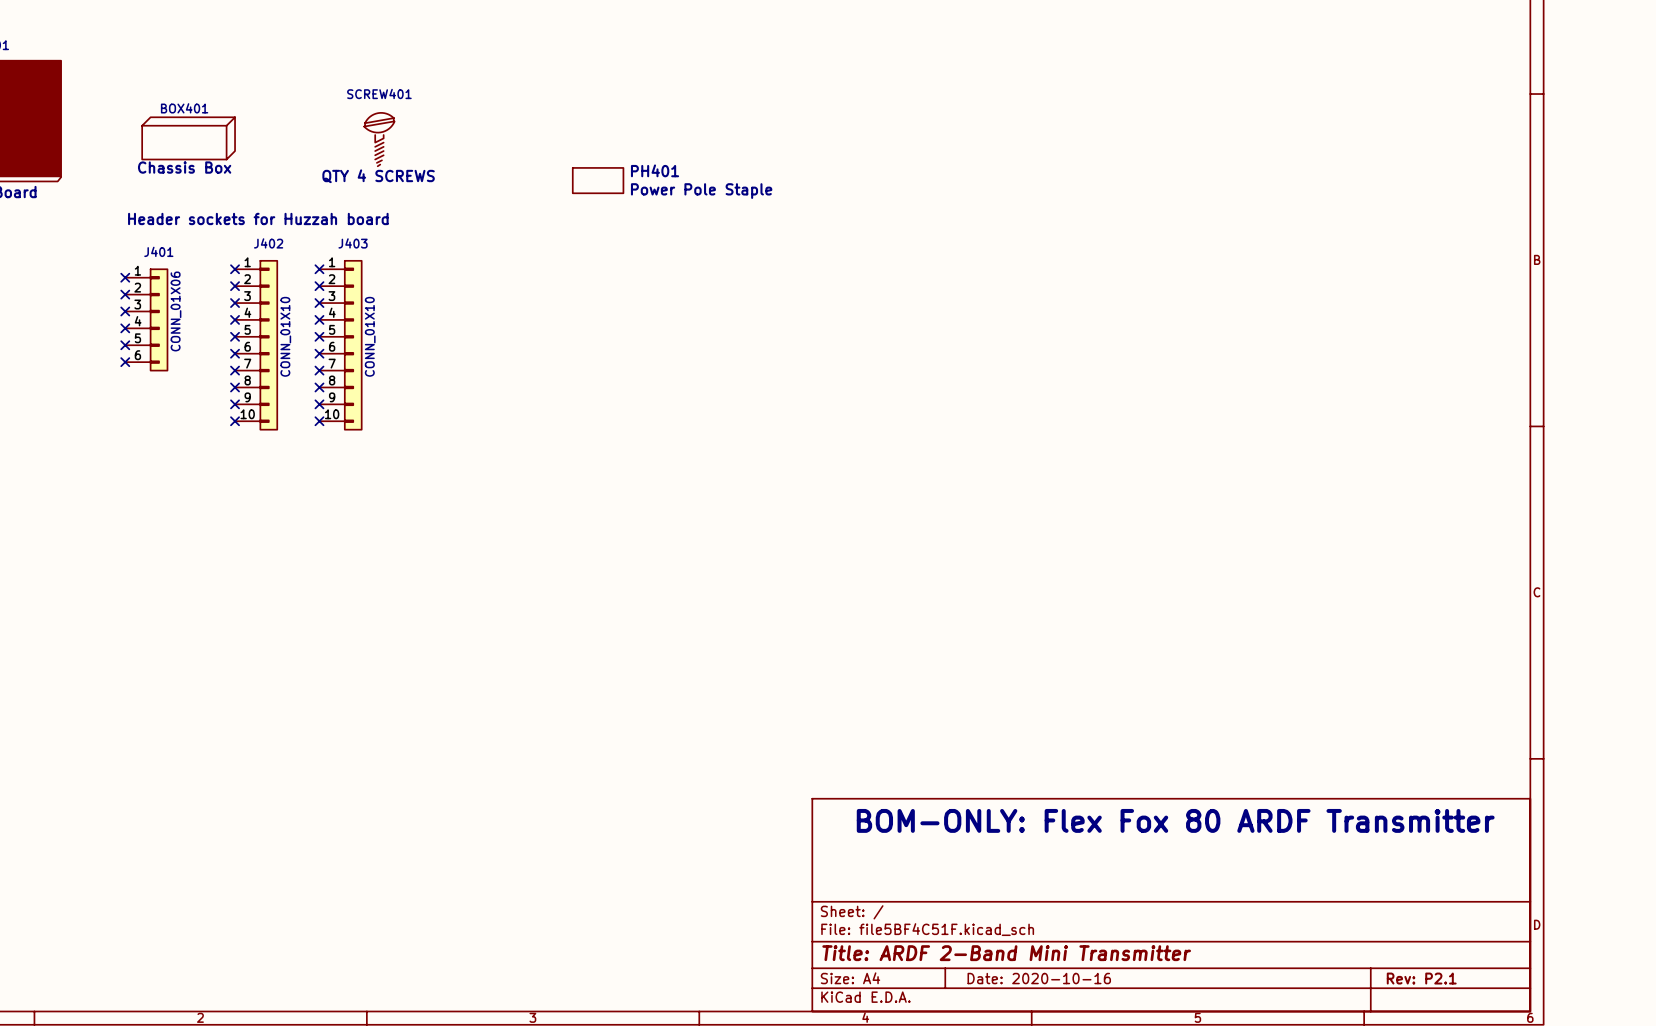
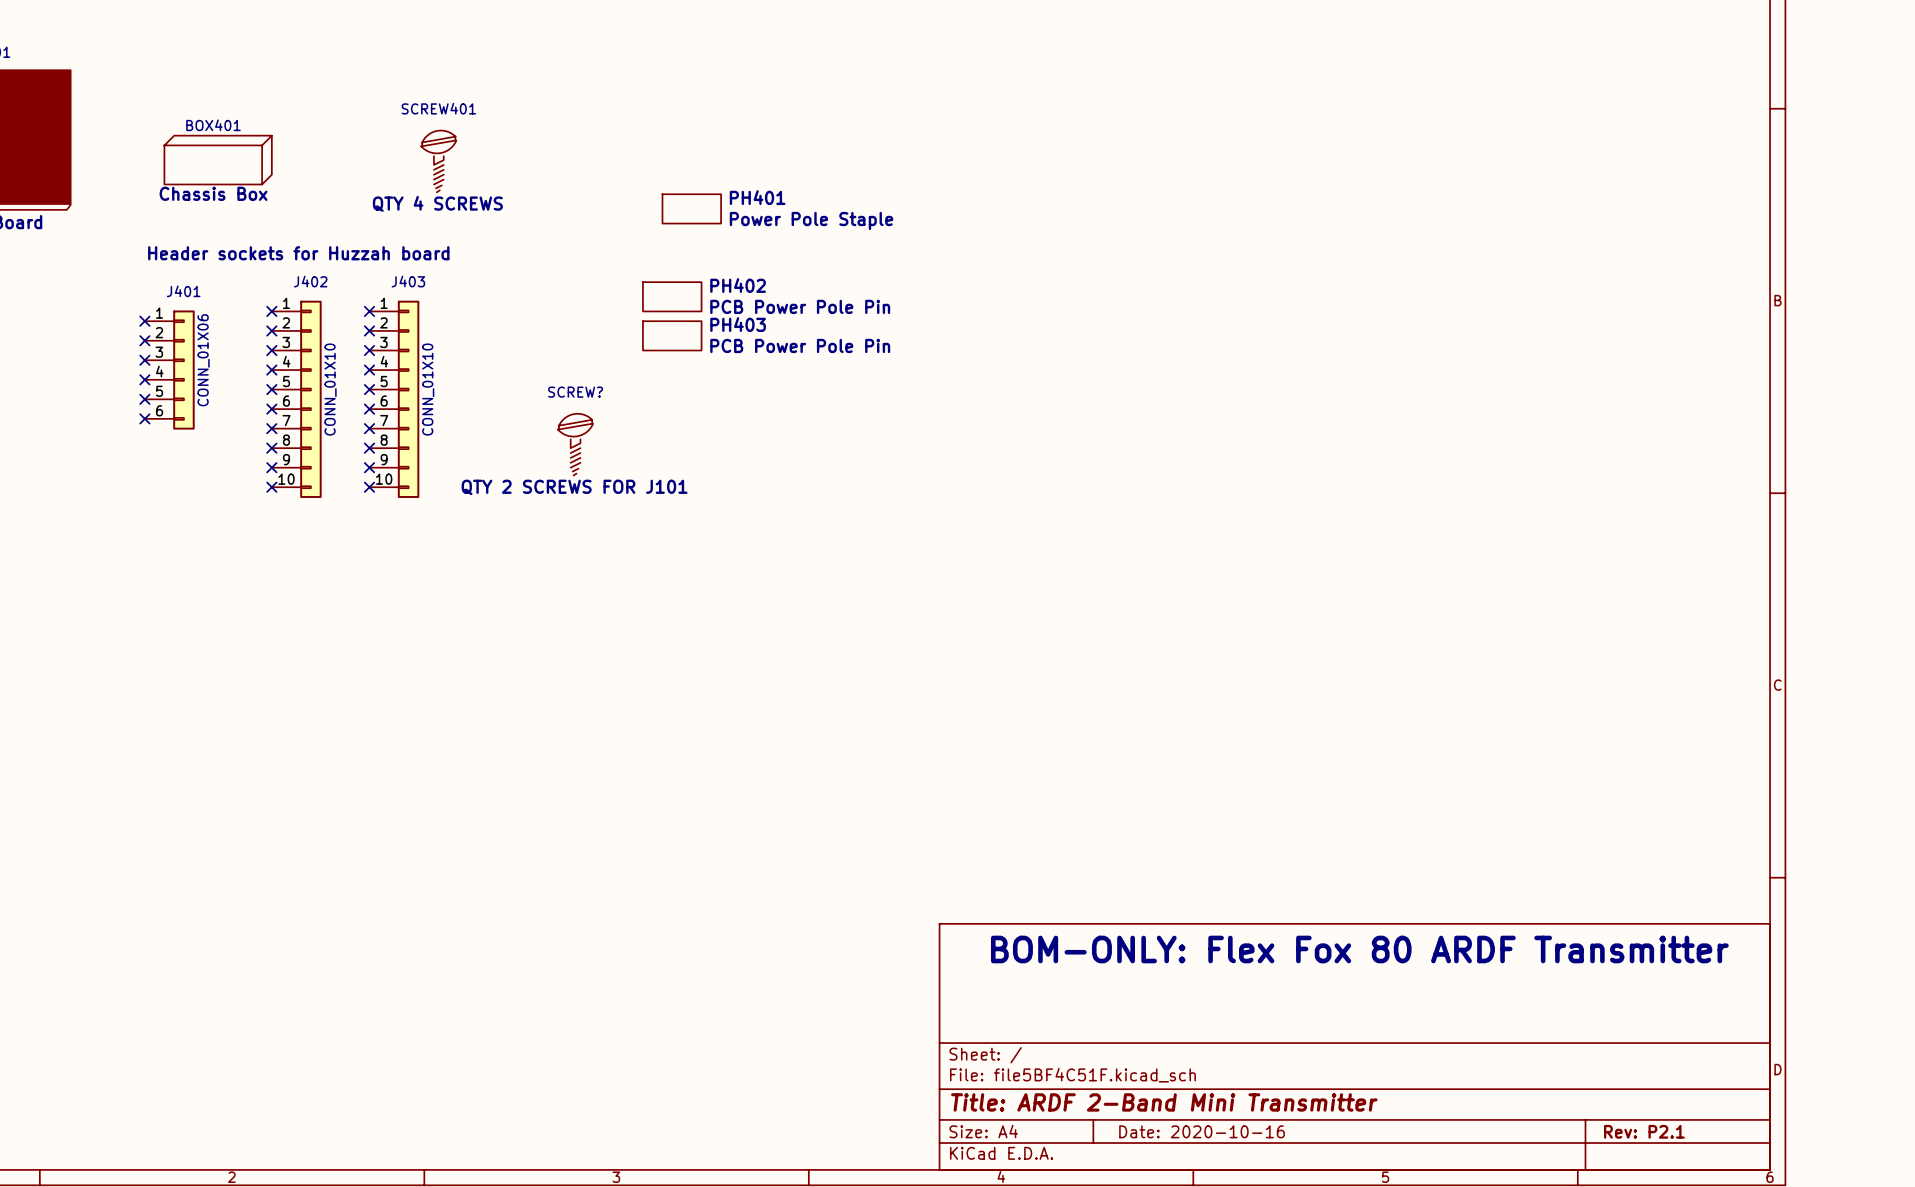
PH402: none -> PCB Power Pole Pin (672, 296)
PH403: none -> PCB Power Pole Pin (672, 335)
SCREW?: none -> QTY 2 SCREWS FOR J101 (575, 444)

